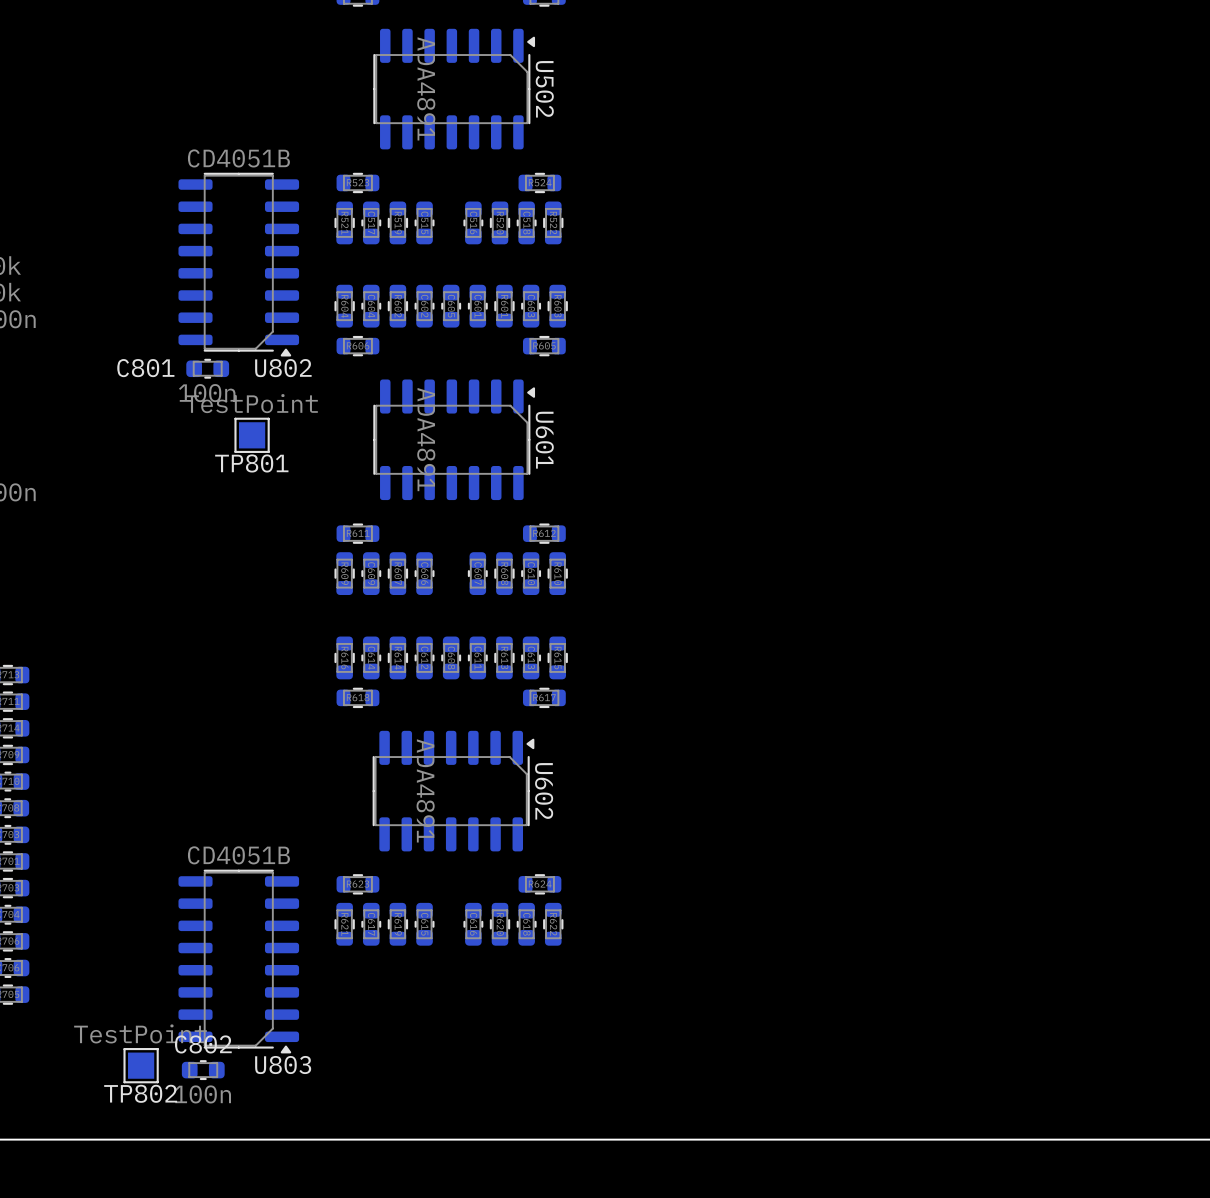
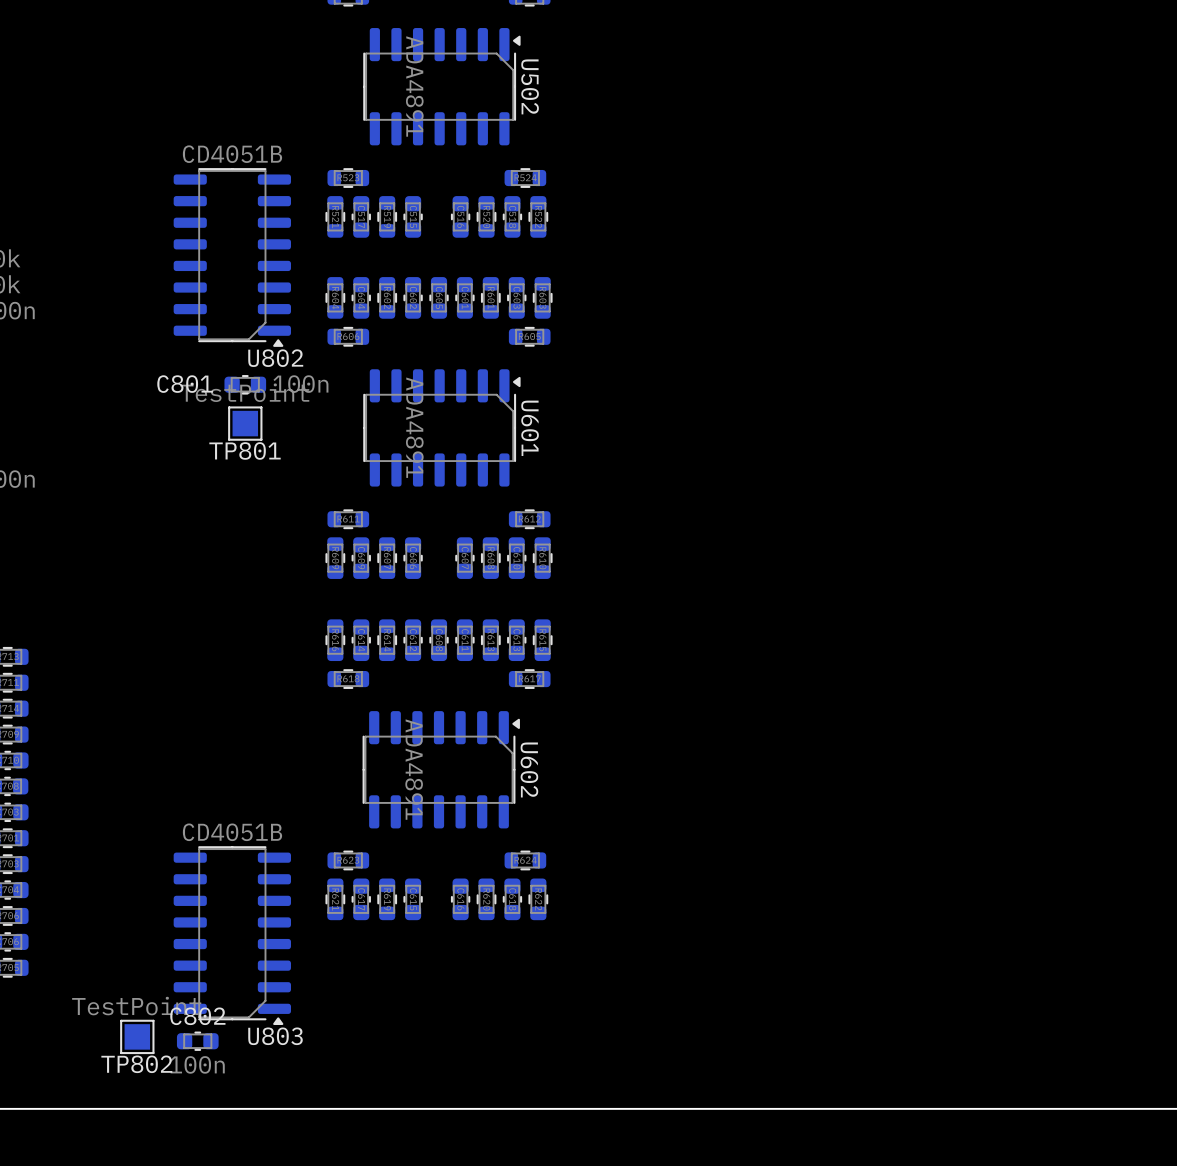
C801 position: (207, 368) -> (245, 384)
C801 value position: 100n (207, 393) -> 100n (300, 384)

